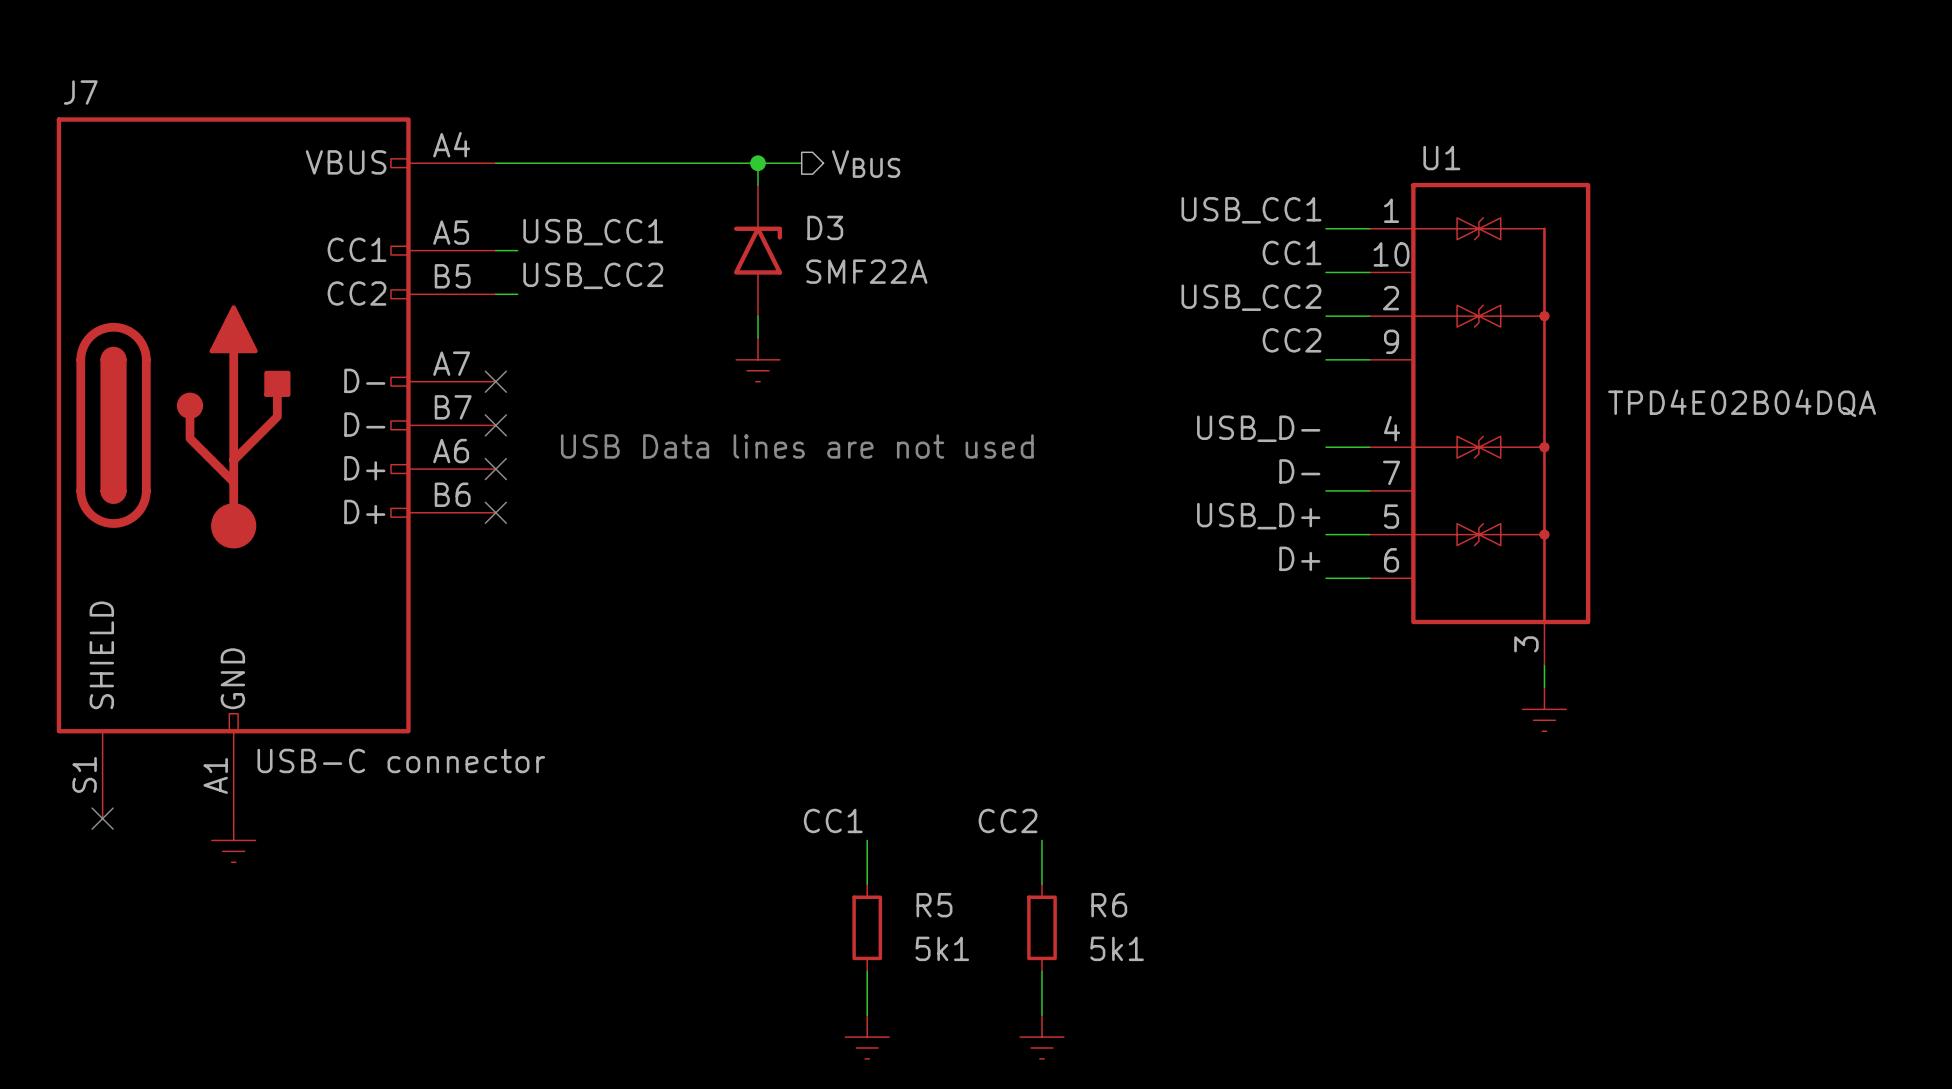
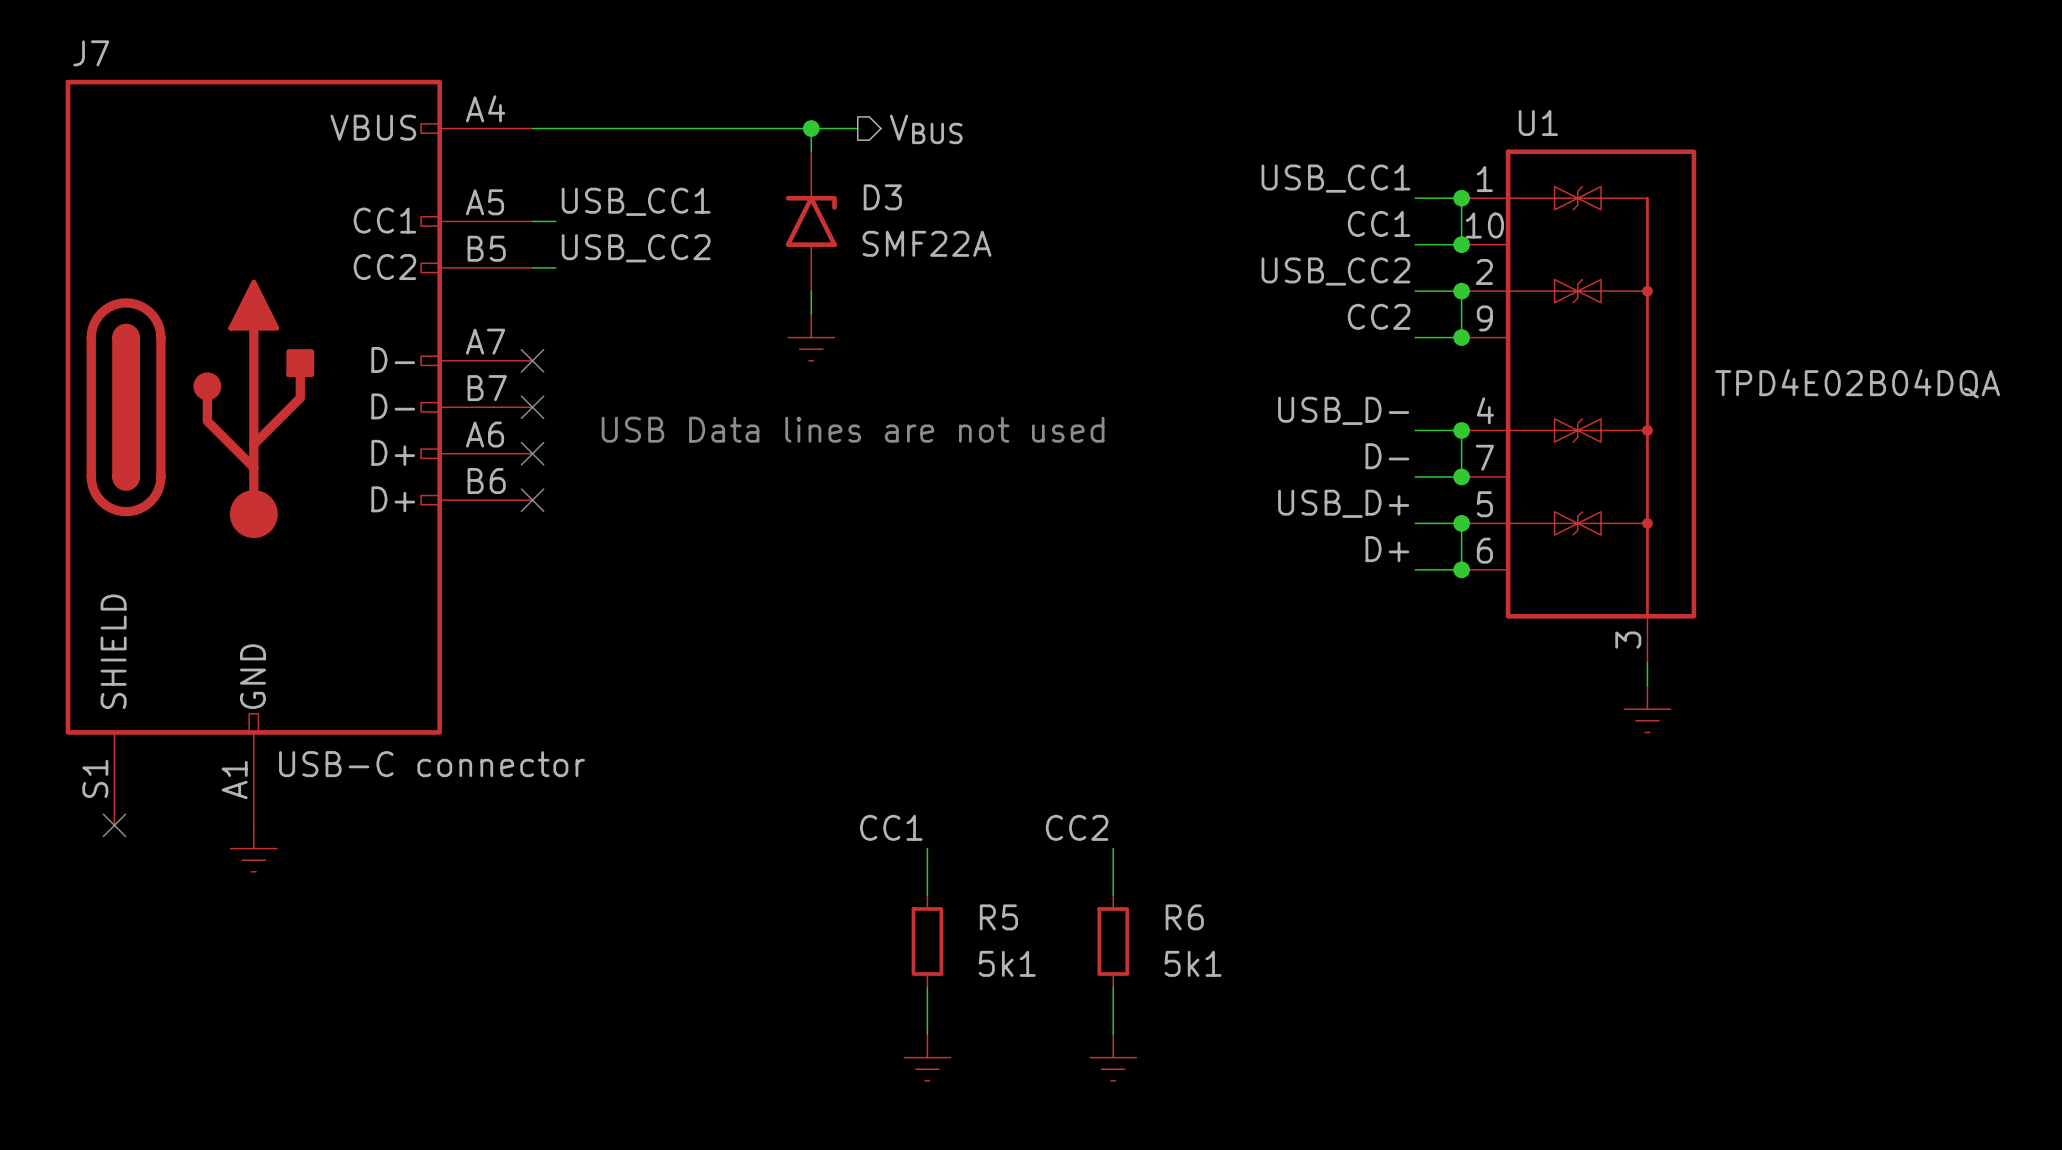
wire: none -> (1461, 198) (1461, 244)
junction: none -> (1461, 198)
junction: none -> (1461, 244)
wire: none -> (1461, 291) (1461, 337)
junction: none -> (1461, 291)
junction: none -> (1461, 337)
wire: none -> (1461, 430) (1461, 476)
junction: none -> (1461, 430)
junction: none -> (1461, 476)
wire: none -> (1461, 523) (1461, 569)
junction: none -> (1461, 523)
junction: none -> (1461, 569)

